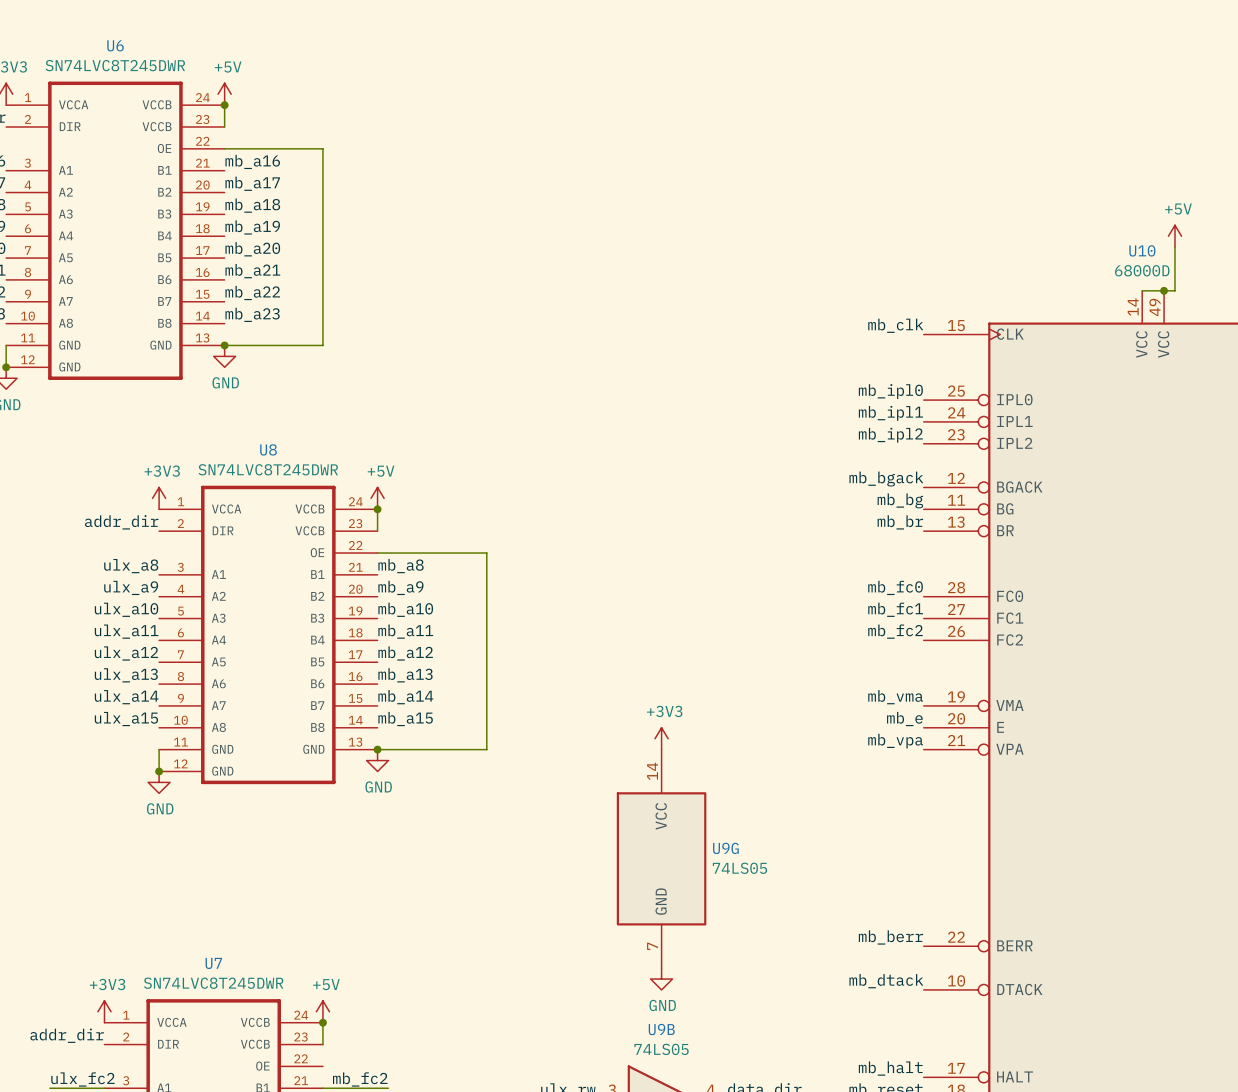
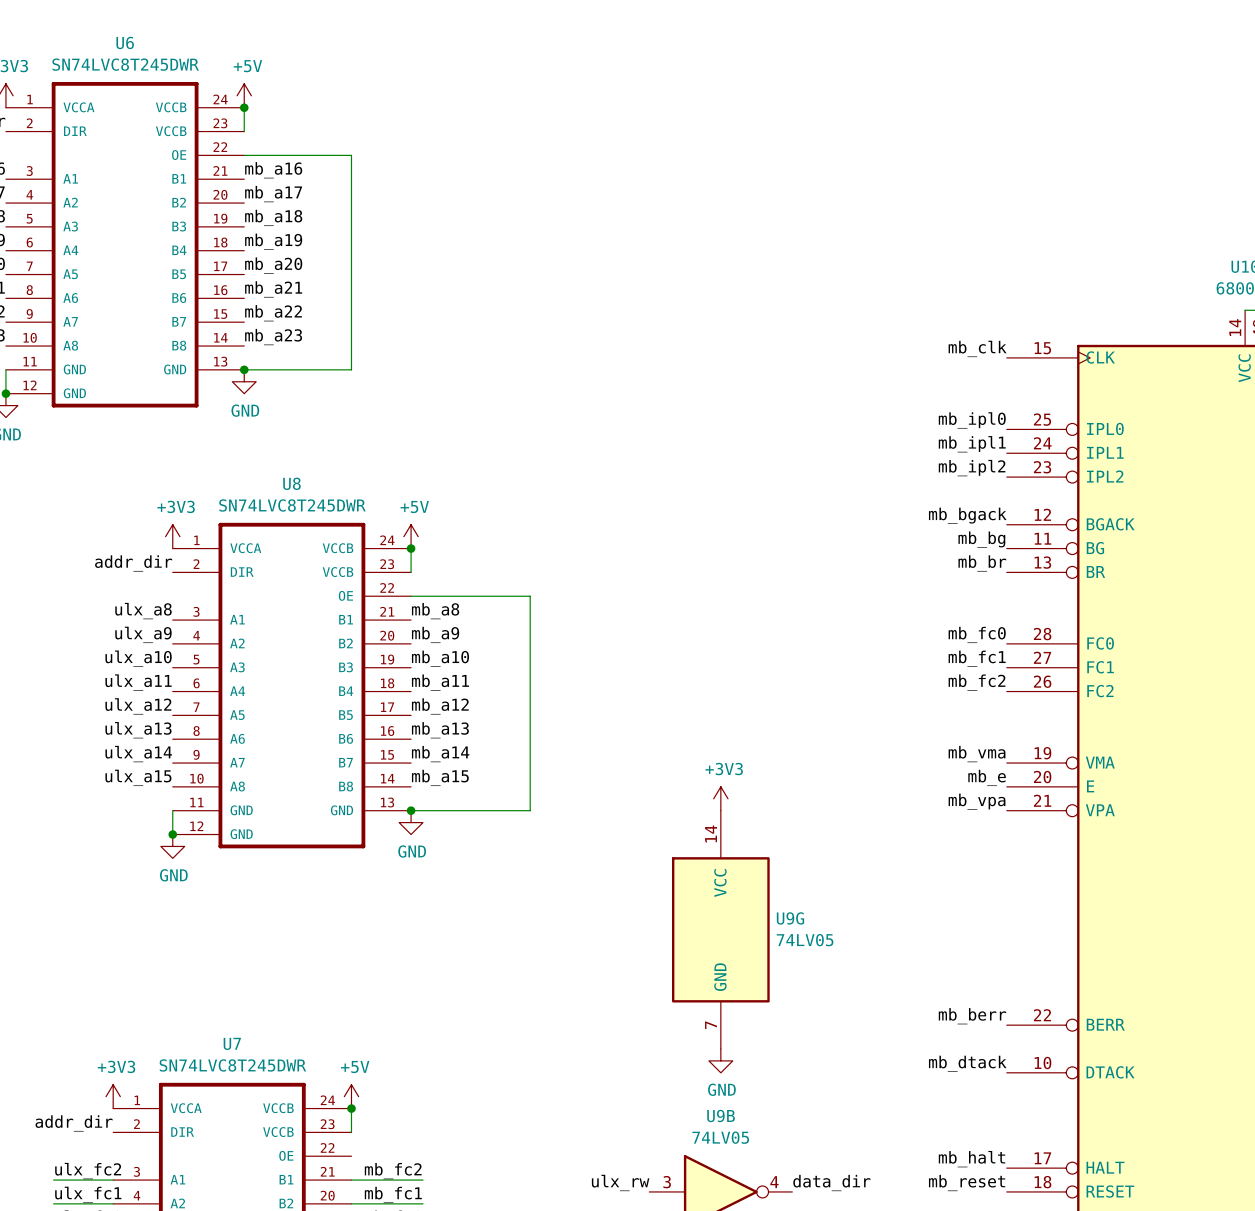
U9G value: 74LS05 (739, 868) -> 74LV05 (805, 940)
U9B value: 74LS05 (661, 1049) -> 74LV05 (720, 1137)

